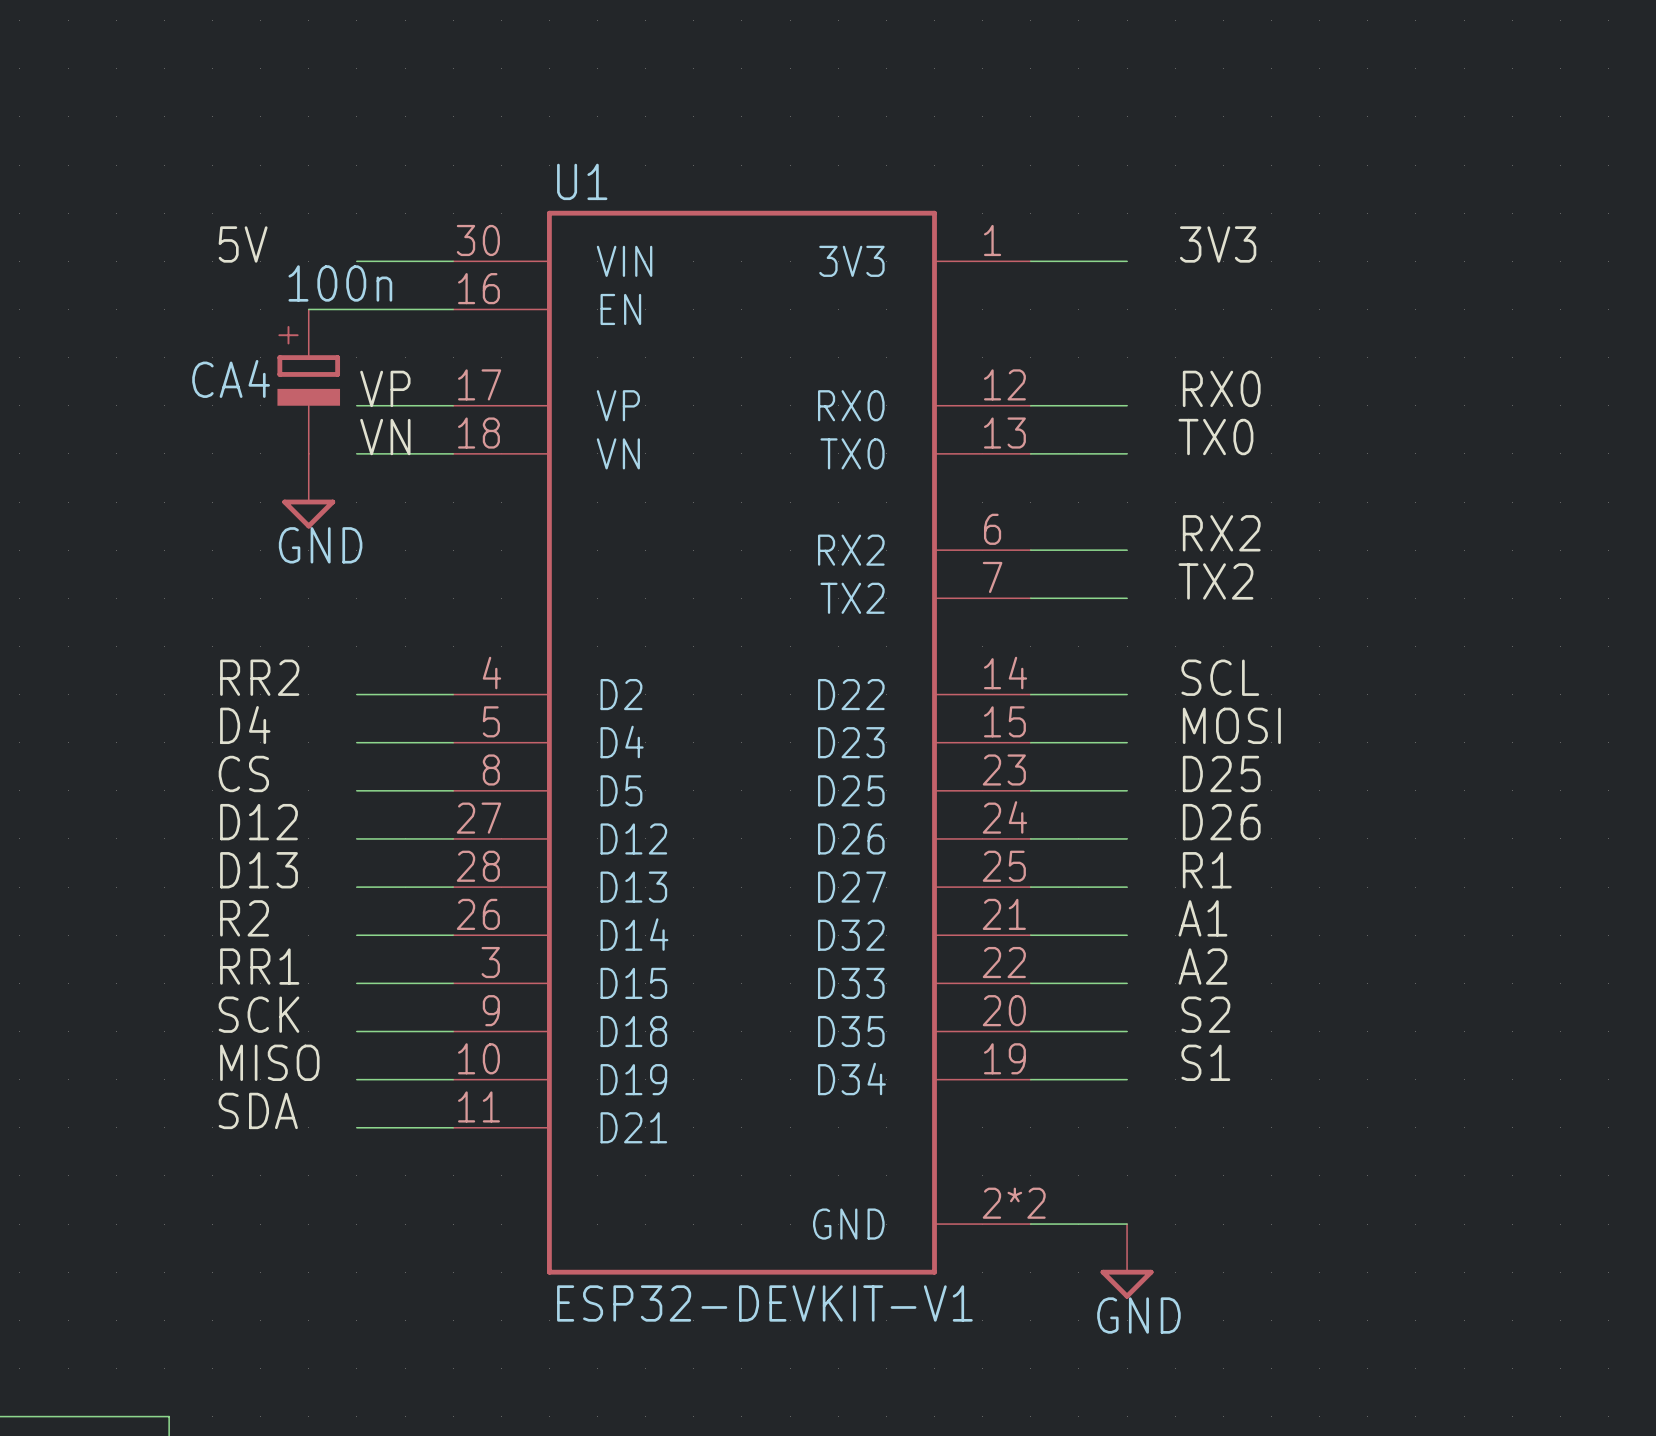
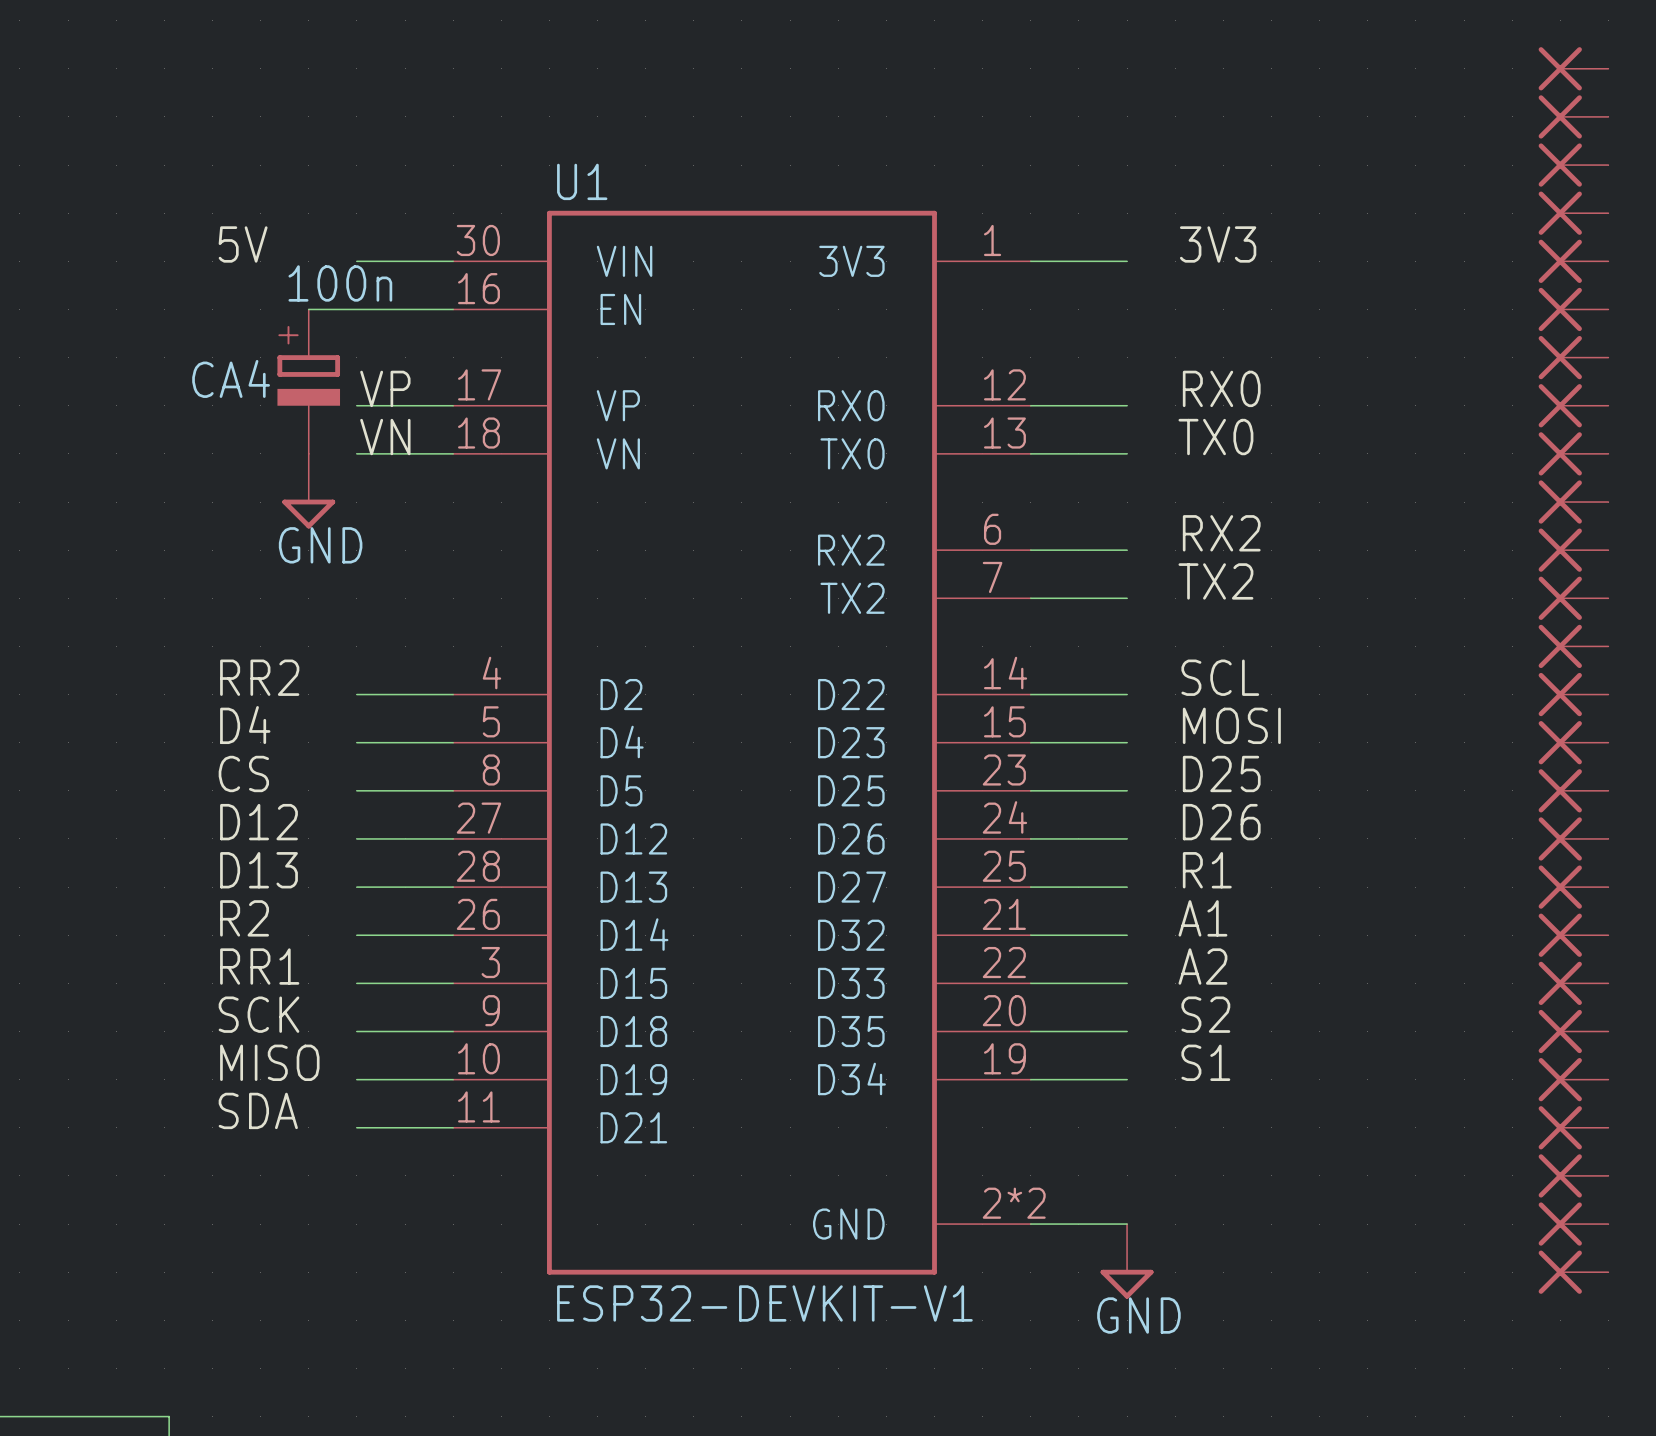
part: none -> (1573, 68)
part: none -> (1573, 116)
part: none -> (1573, 165)
part: none -> (1573, 213)
part: none -> (1573, 261)
part: none -> (1573, 309)
part: none -> (1573, 357)
part: none -> (1573, 405)
part: none -> (1573, 453)
part: none -> (1573, 502)
part: none -> (1573, 550)
part: none -> (1573, 598)
part: none -> (1573, 646)
part: none -> (1573, 694)
part: none -> (1573, 742)
part: none -> (1573, 790)
part: none -> (1573, 838)
part: none -> (1573, 887)
part: none -> (1573, 935)
part: none -> (1573, 983)
part: none -> (1573, 1031)
part: none -> (1573, 1079)
part: none -> (1573, 1127)
part: none -> (1573, 1175)
part: none -> (1573, 1224)
part: none -> (1573, 1272)

